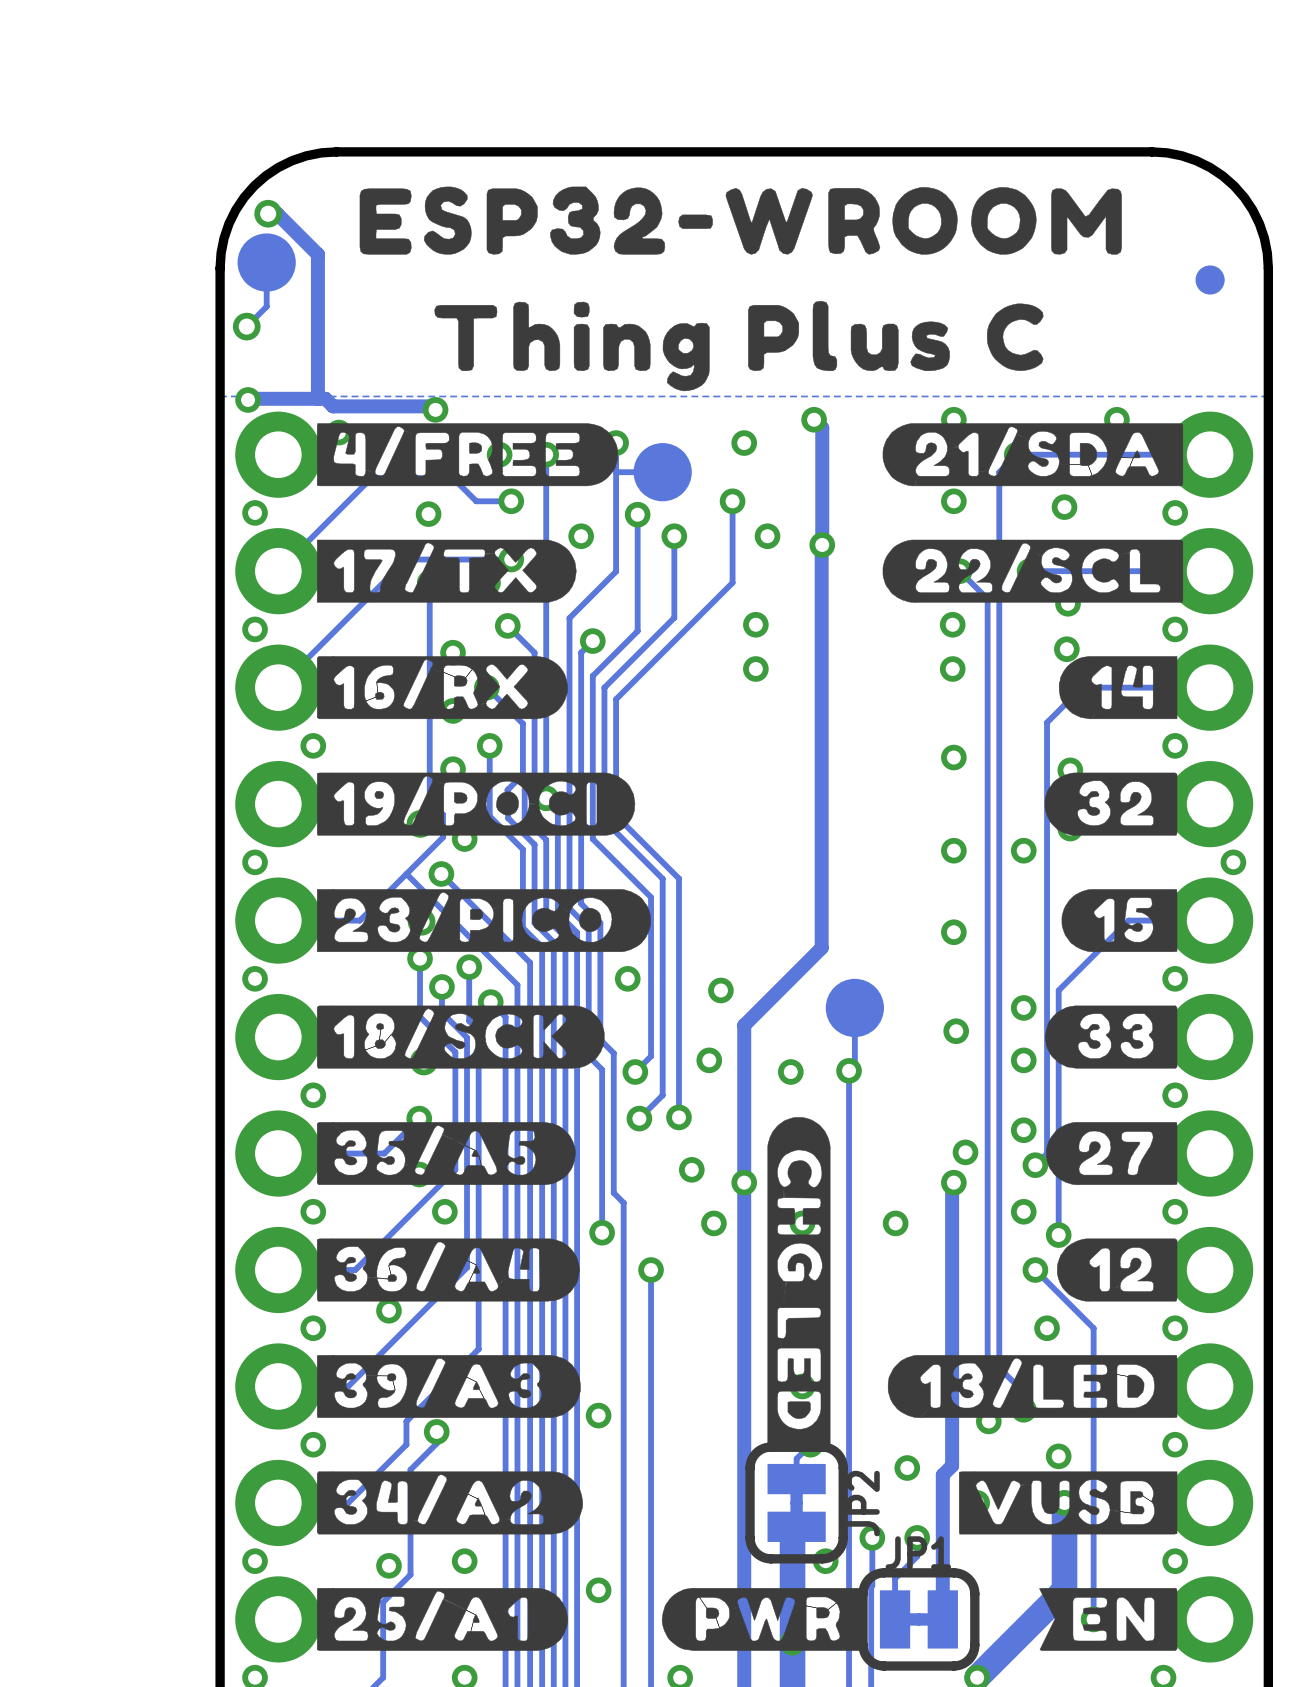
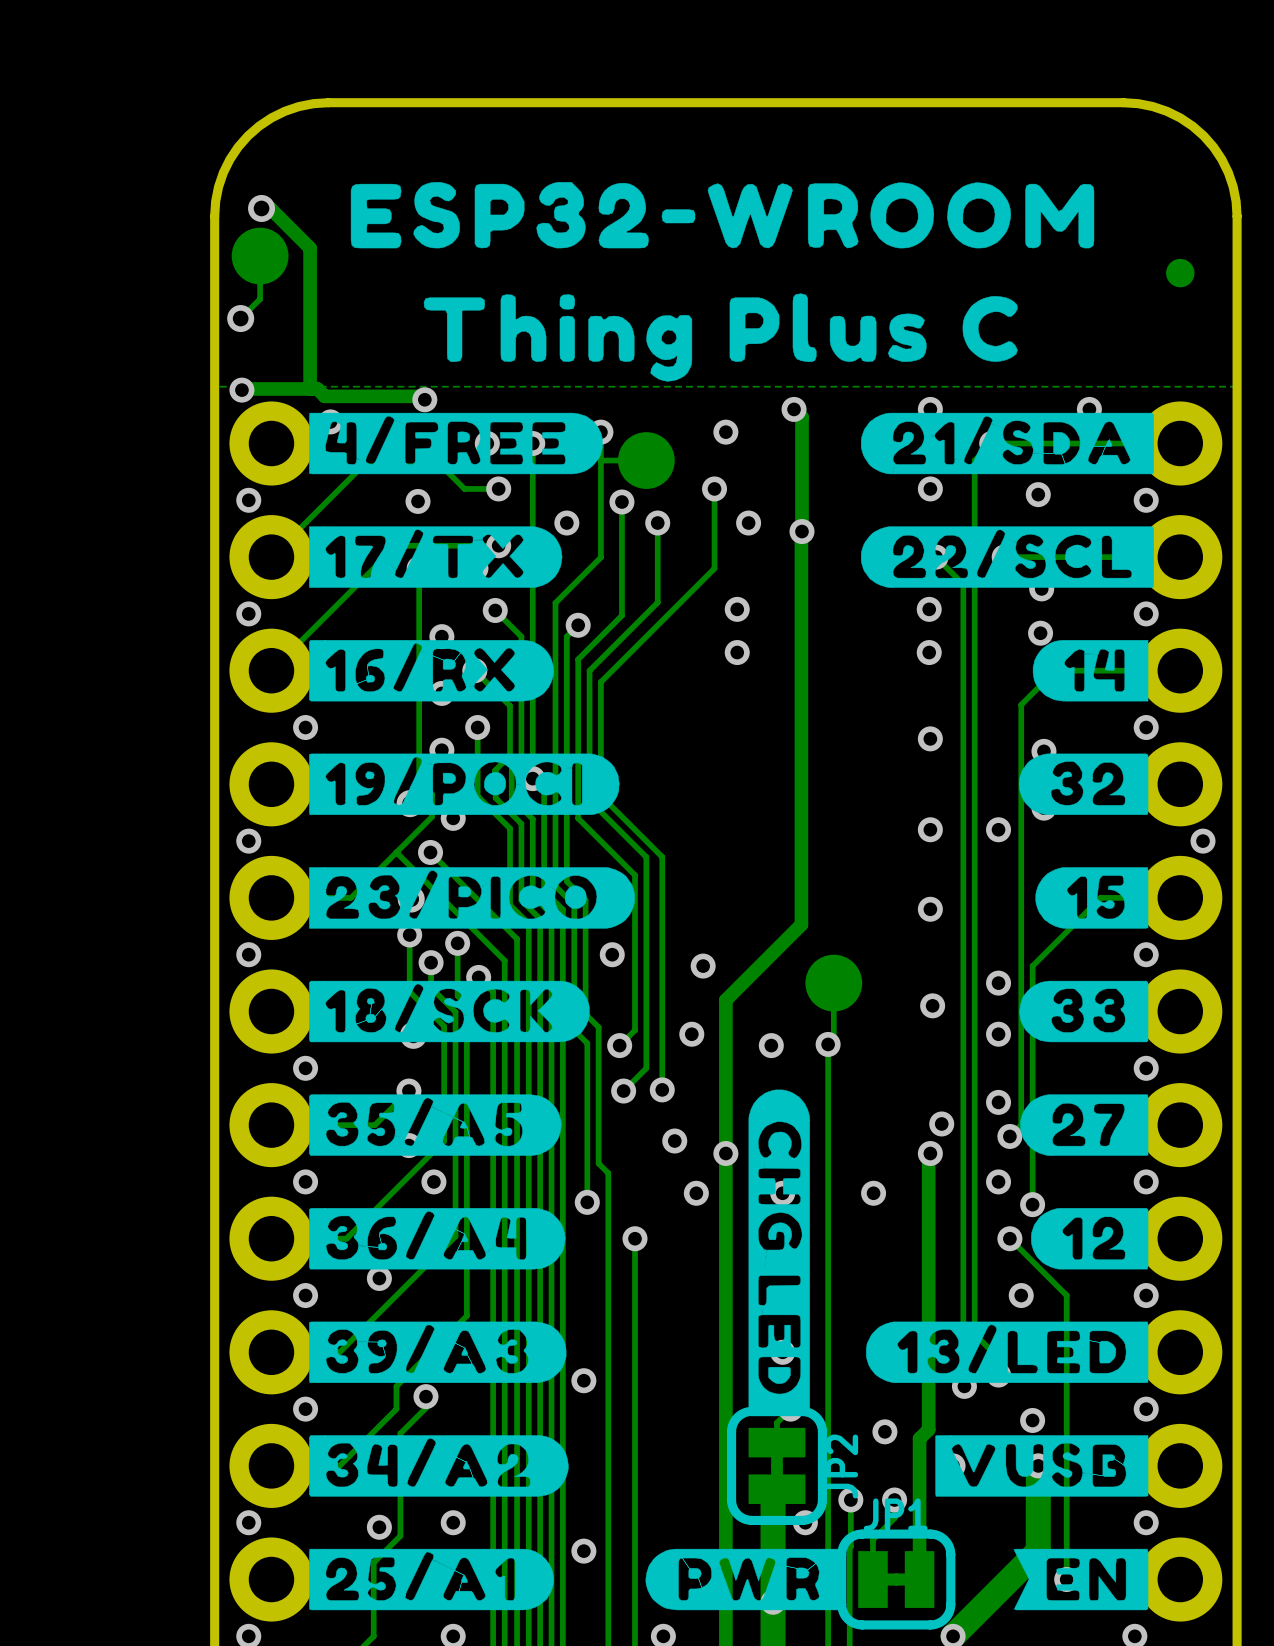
board edge: (1268, 268) (1264, 238) (1259, 223) (1244, 197) (1234, 185) (1222, 175) (1196, 160) (1182, 155) (1151, 151) (321, 152) (291, 160) (265, 175) (254, 185) (244, 197) (228, 223) (224, 238) (220, 268) -> (1237, 261) (1237, 216) (1233, 186) (1228, 172) (1213, 147) (1192, 126) (1166, 111) (1152, 106) (1123, 102) (313, 103) (284, 111) (259, 126) (247, 135) (229, 159) (218, 186) (215, 201) (214, 261)

